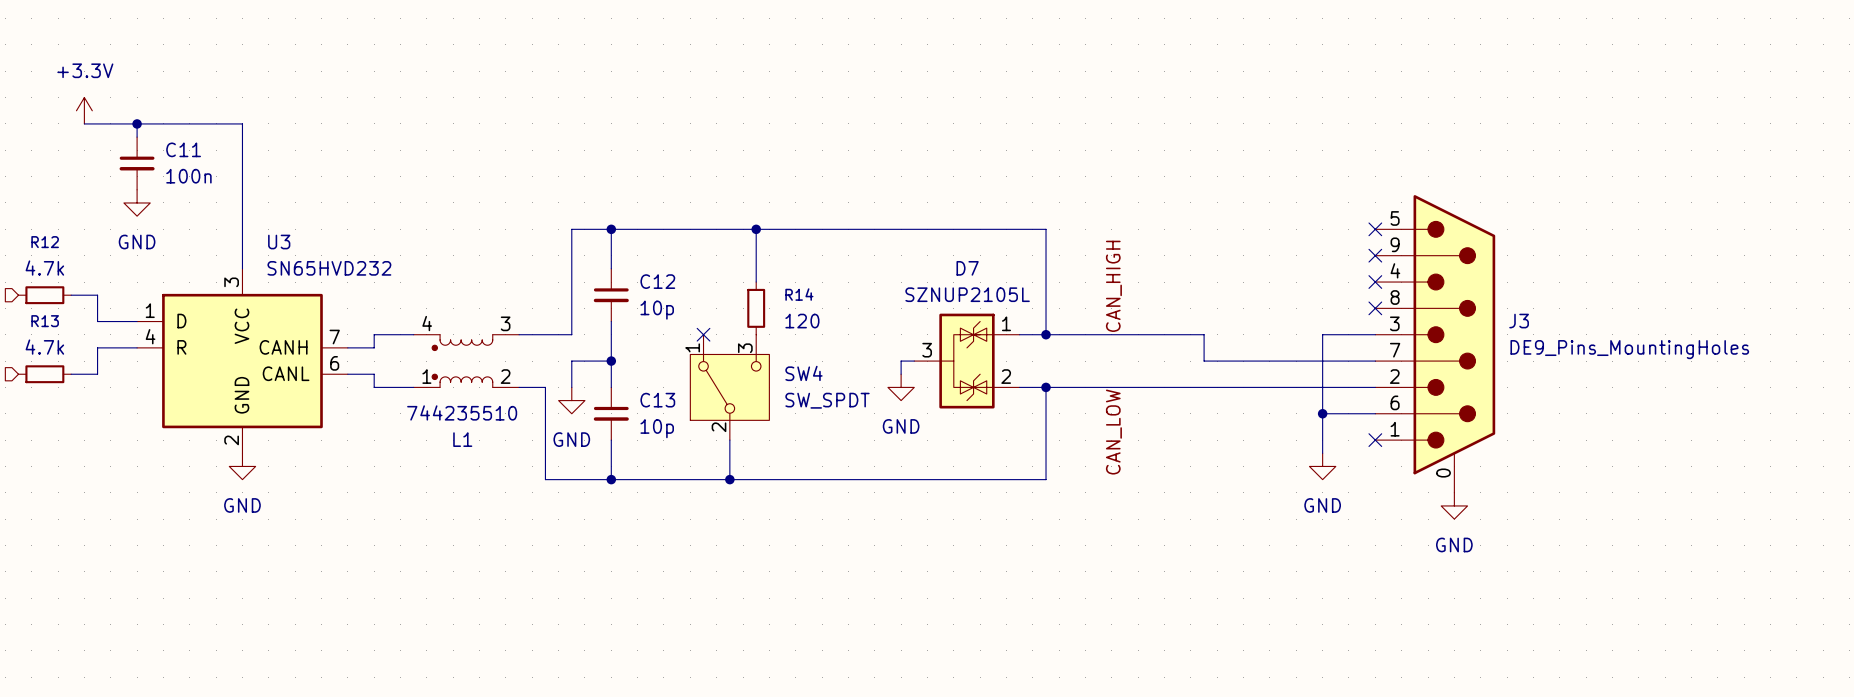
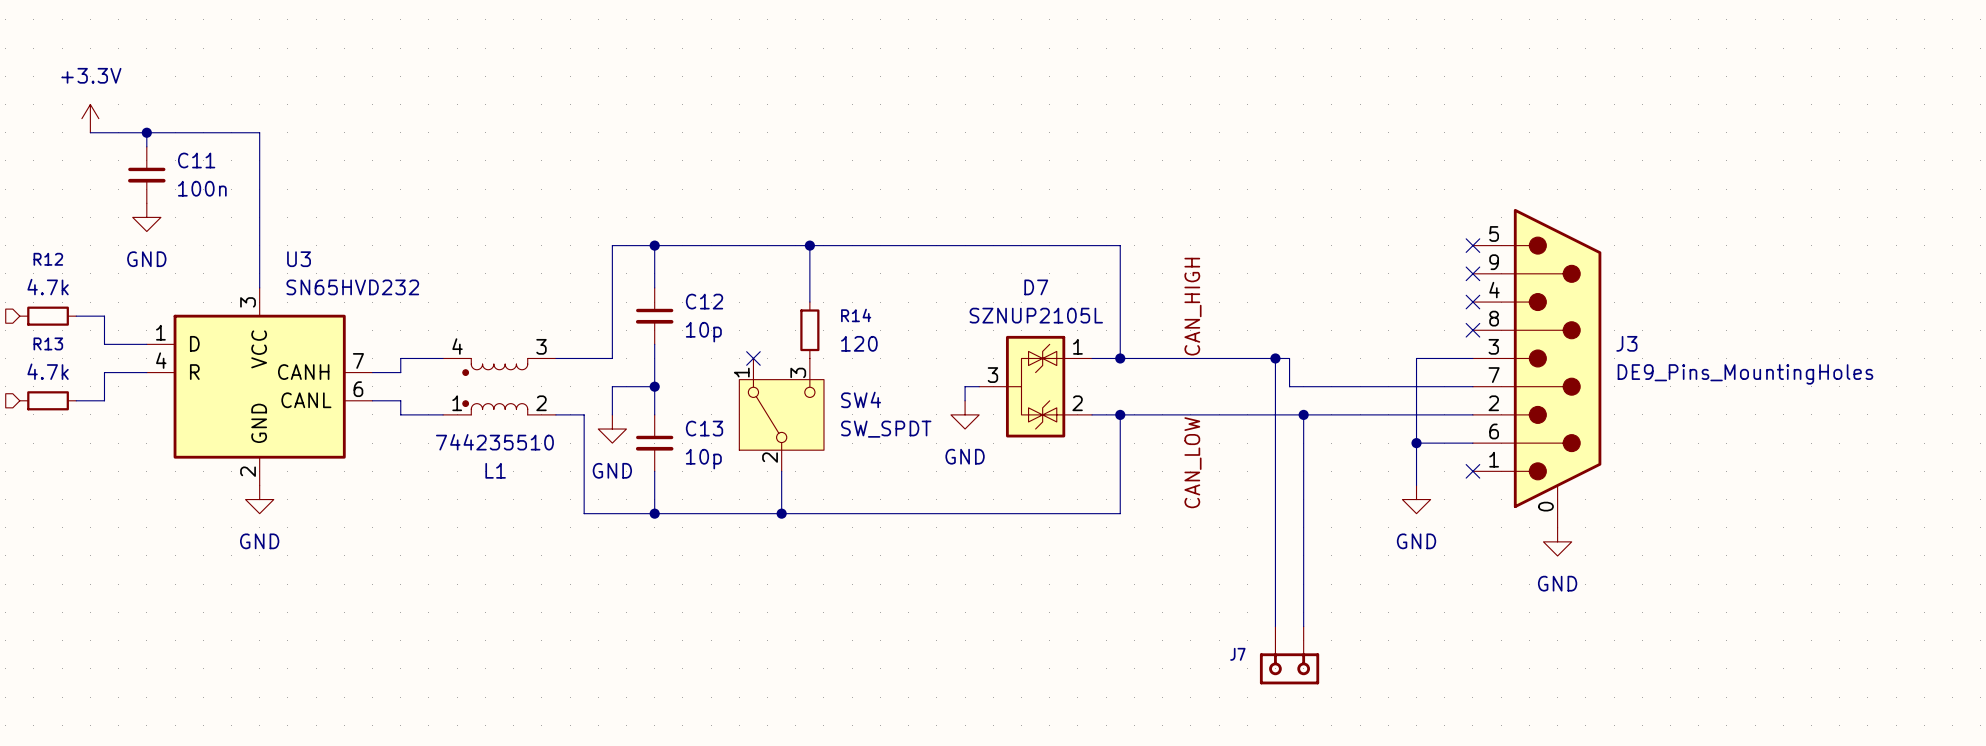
wire: none -> (1275, 358) (1275, 626)
junction: none -> (1275, 358)
wire: none -> (1303, 414) (1303, 626)
junction: none -> (1303, 414)
J7: none -> (1289, 655)

